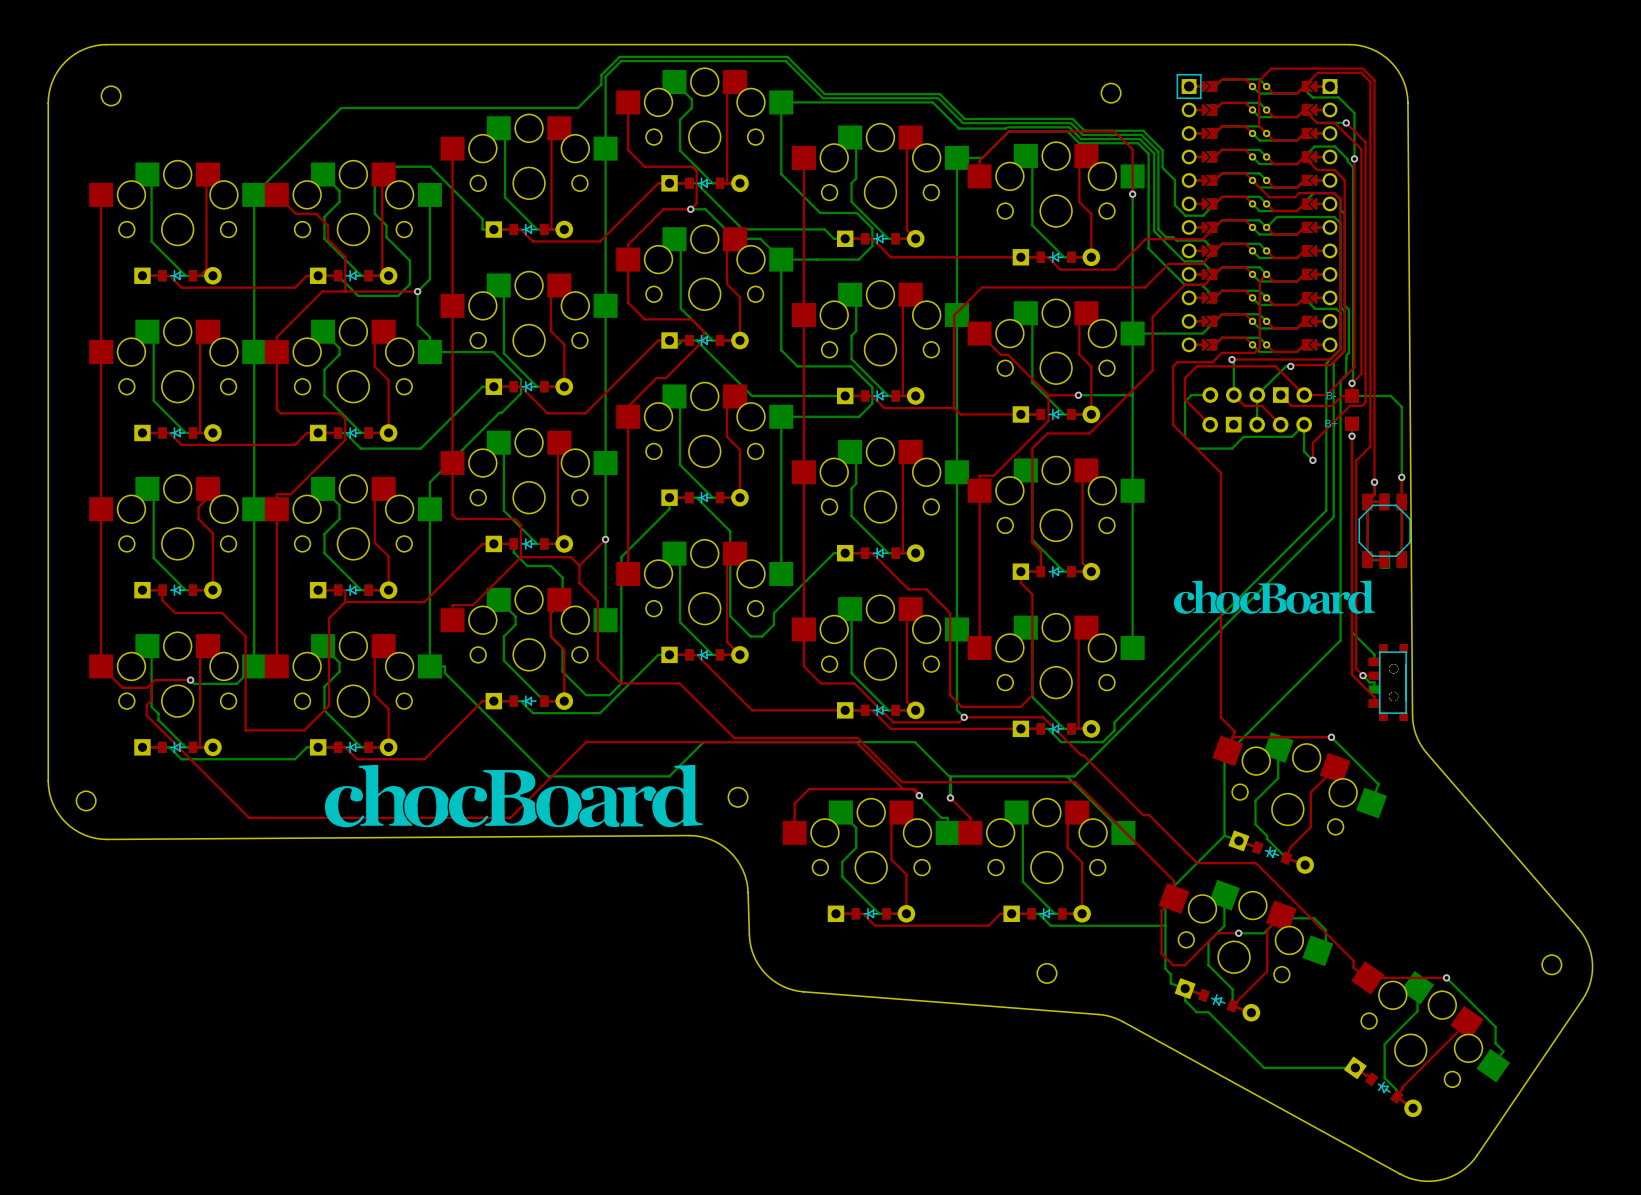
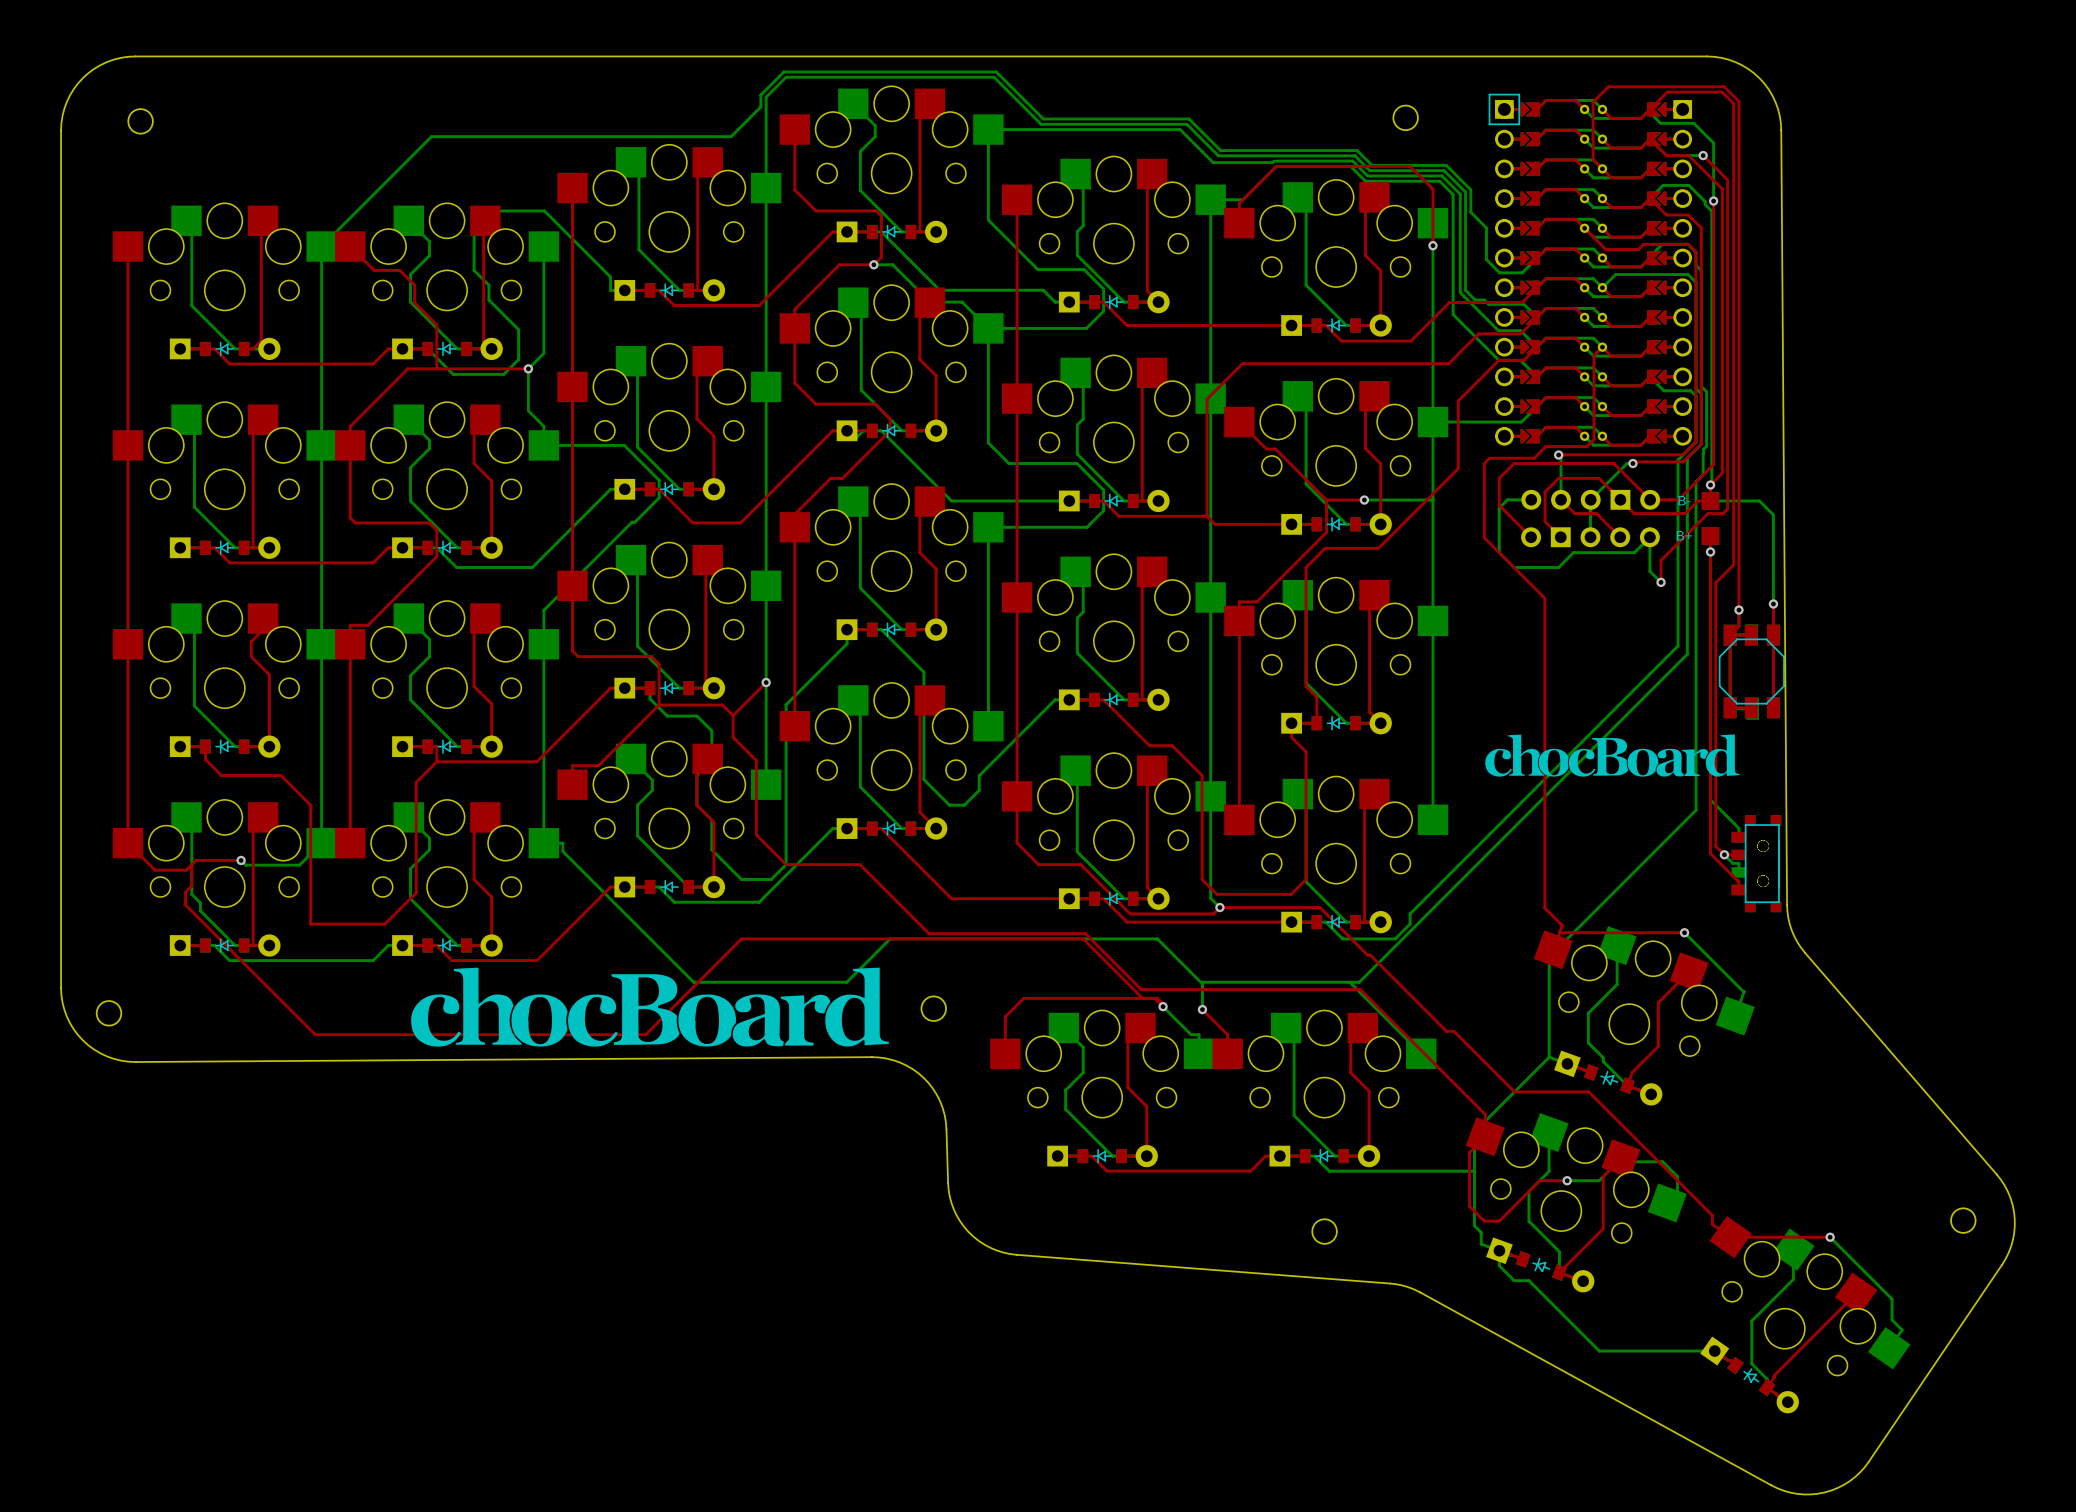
top track: none -> (1620, 499) (1599, 478) (1558, 478) (1545, 491) (1545, 521) (1560, 537)

